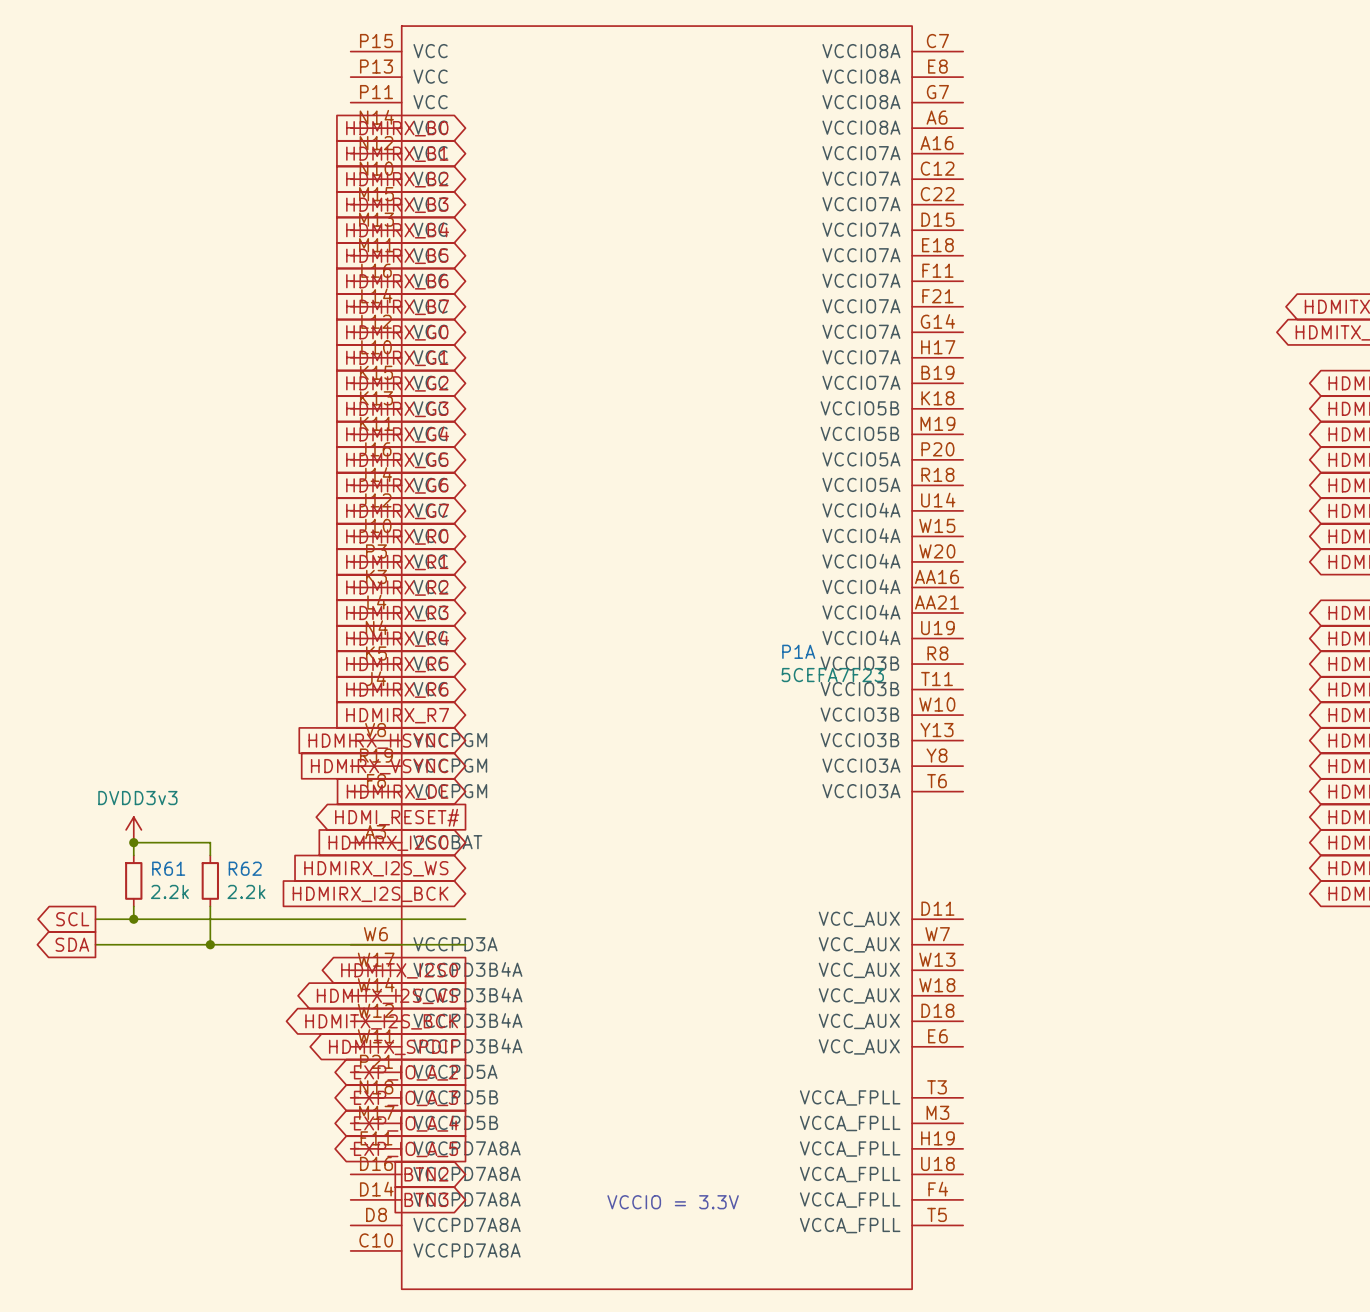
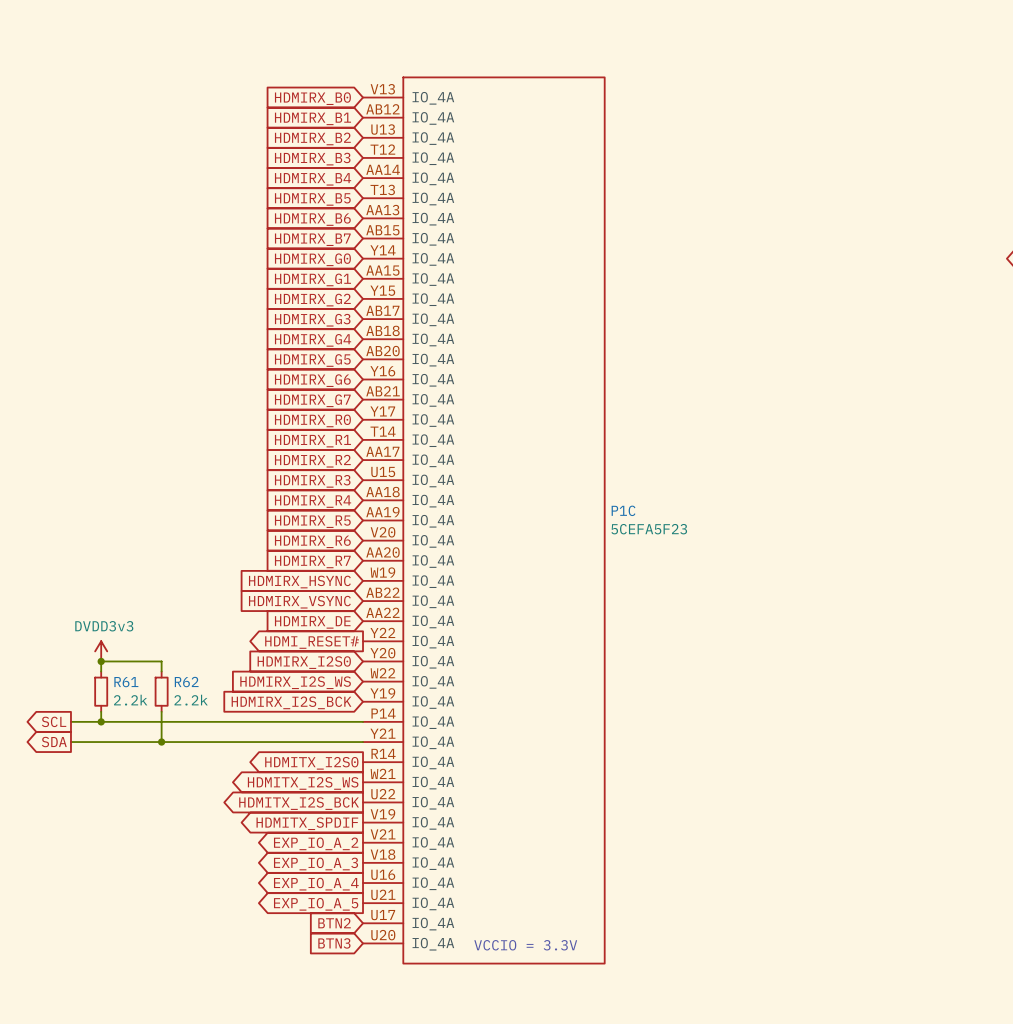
P1A: 5CEFA7F23 (656, 657) -> none
P1C: none -> 5CEFA5F23 (483, 520)

